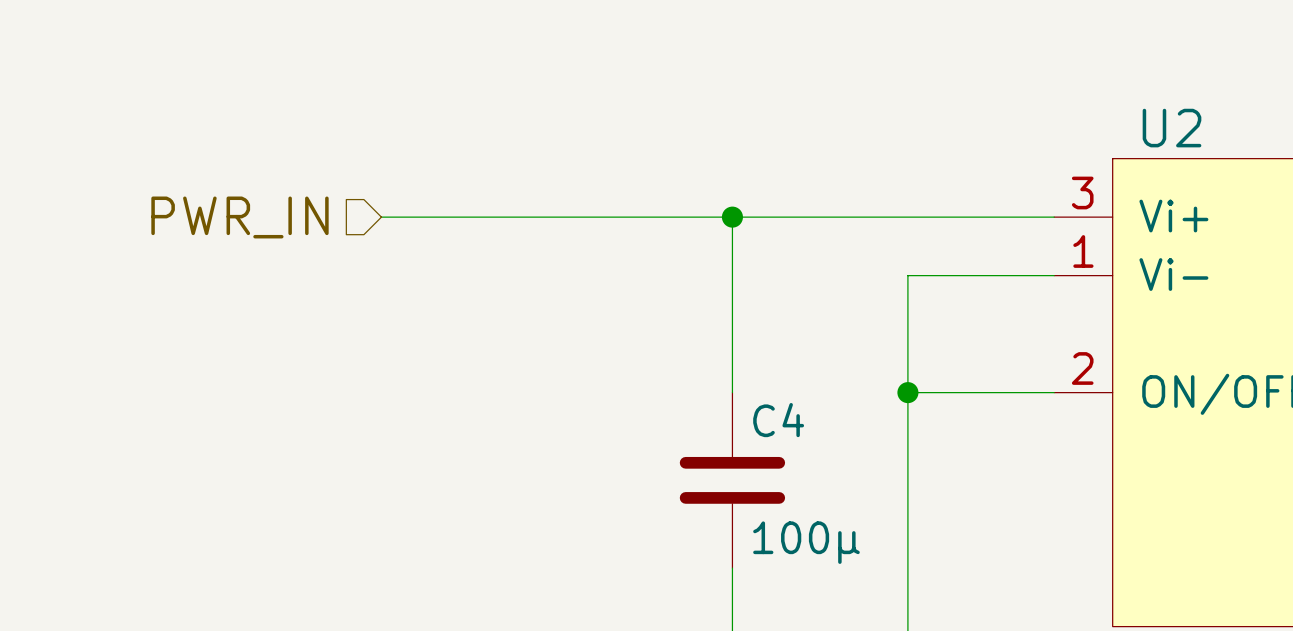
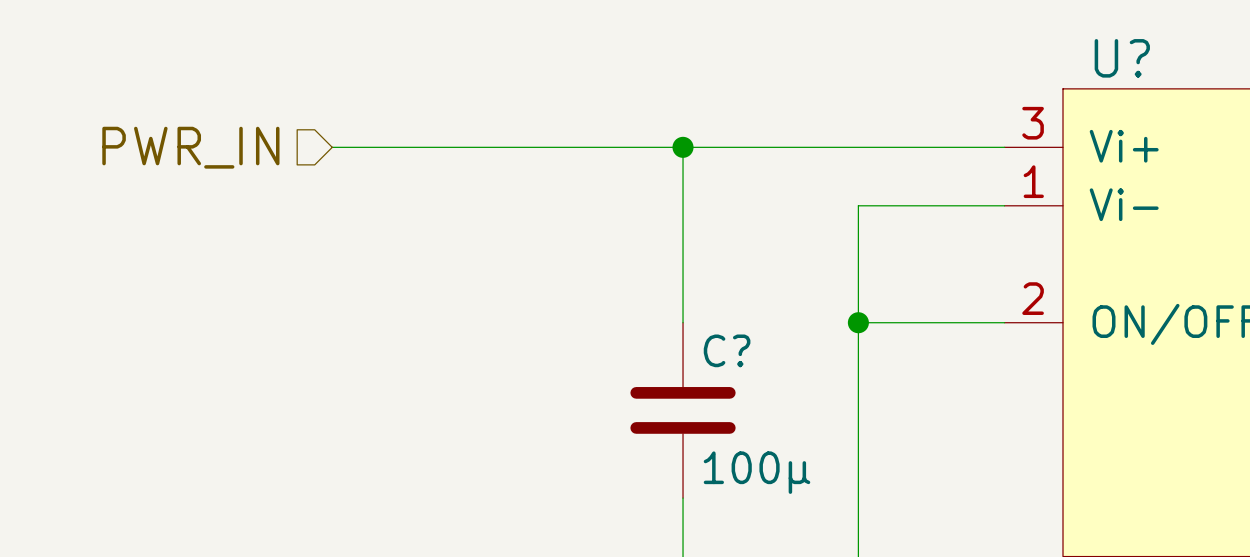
U2 name: U2 (1172, 128) -> U? (1122, 58)
C4 name: C4 (778, 420) -> C? (727, 350)

